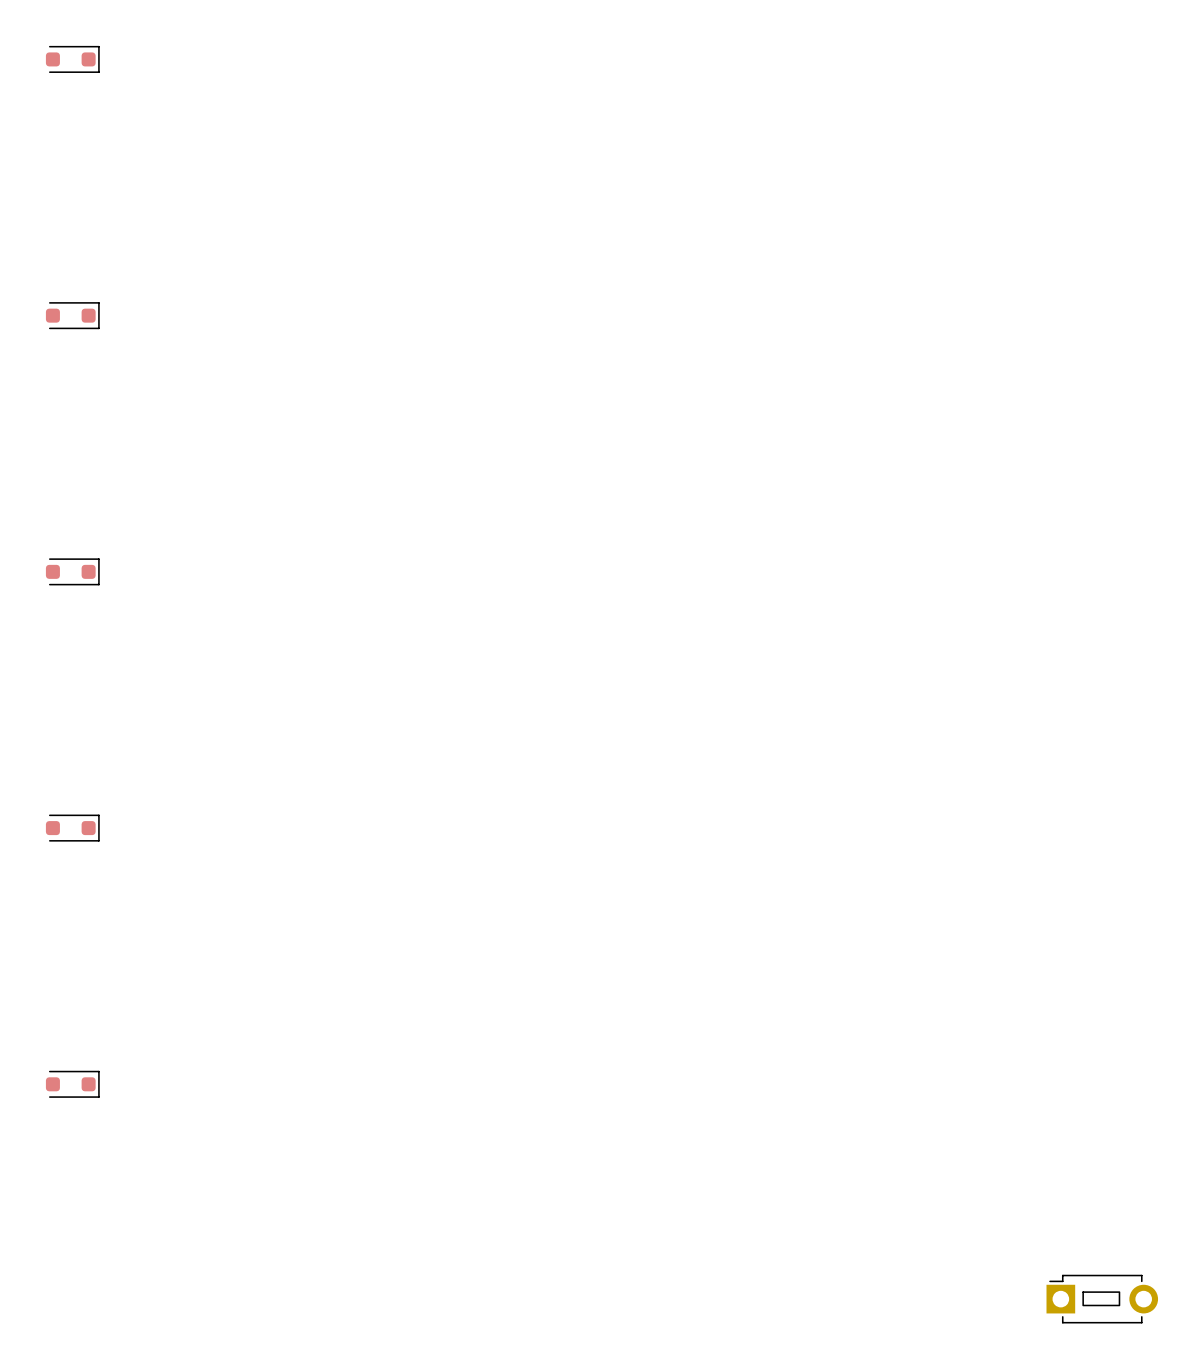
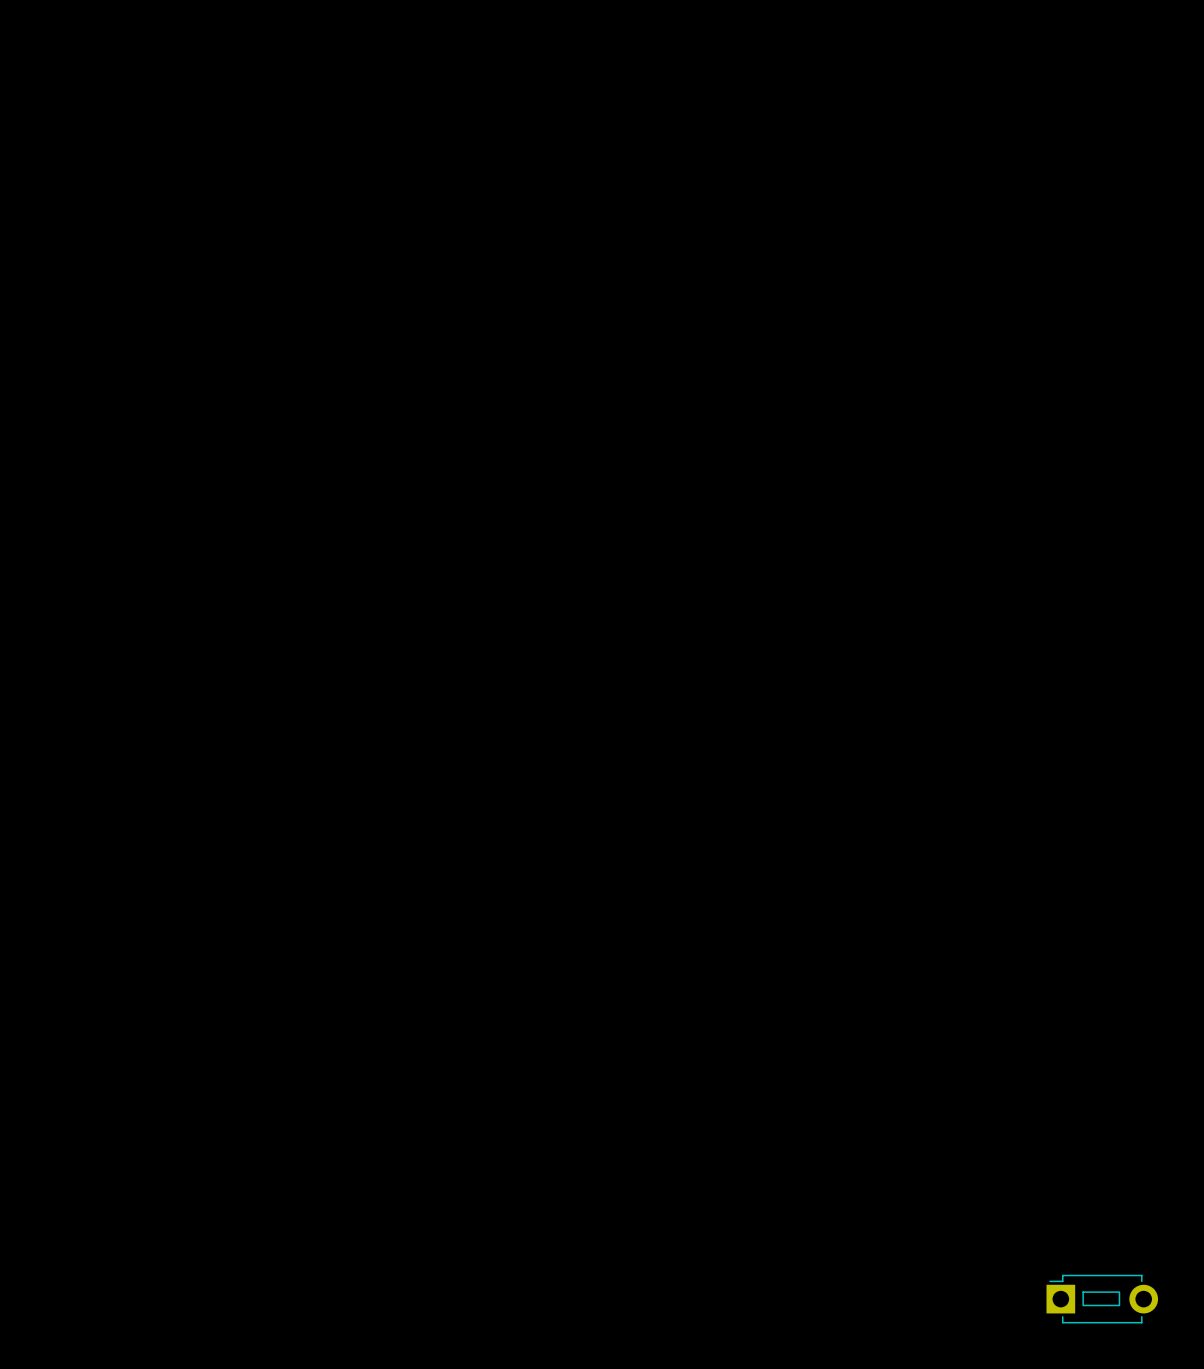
part: (72, 59) -> none
part: (72, 315) -> none
part: (72, 571) -> none
part: (72, 828) -> none
part: (72, 1084) -> none

